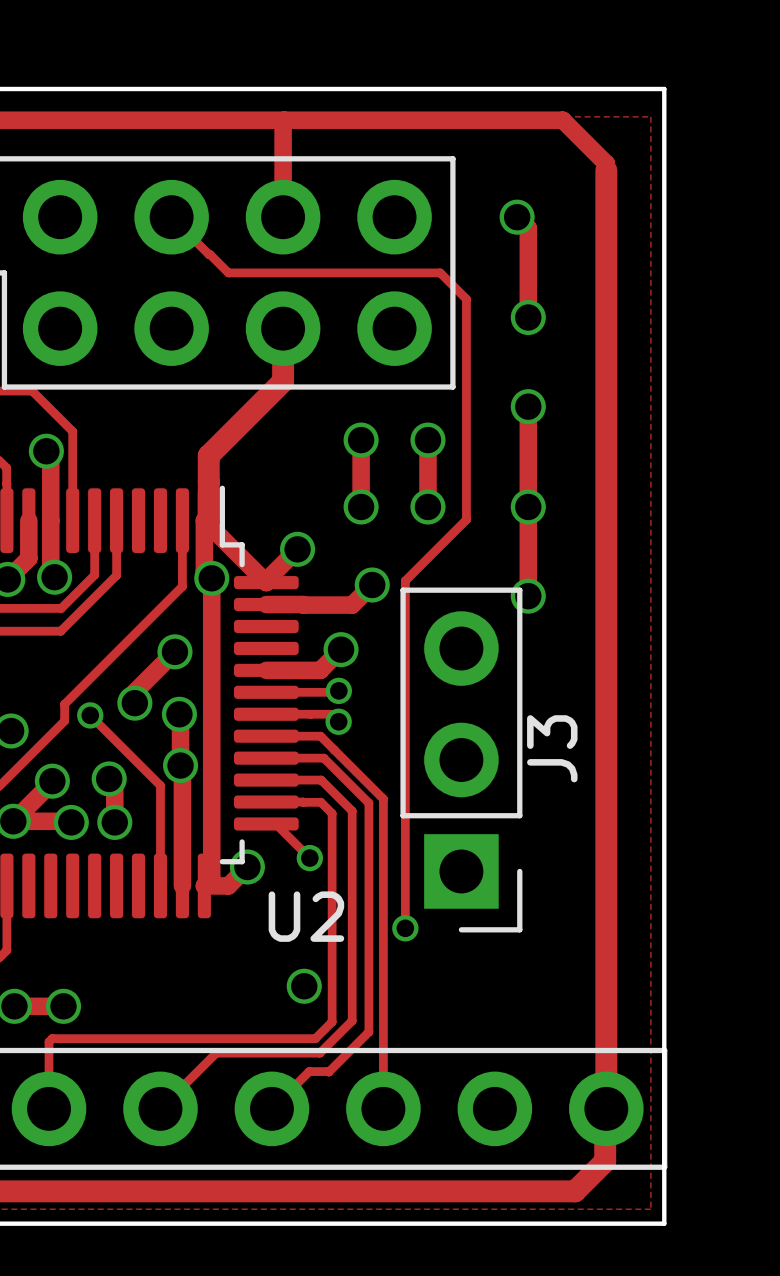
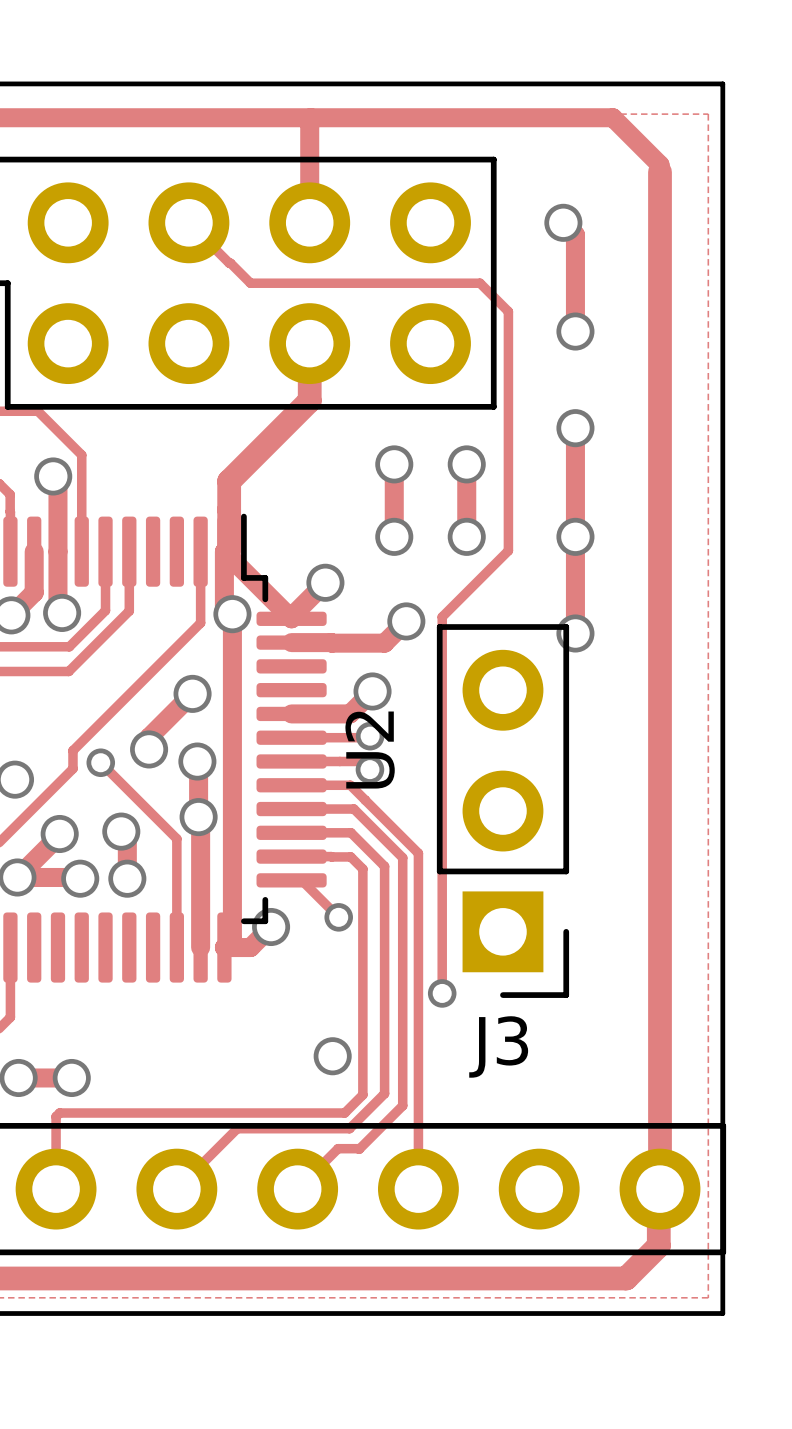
J3 name rotation: 0° (552, 748) -> 90° clockwise (498, 1046)
J3 name position: J3 (552, 748) -> J3 (498, 1046)
U2 name rotation: 0° (306, 916) -> 90° counterclockwise (370, 750)
U2 name position: U2 (306, 916) -> U2 (370, 750)

